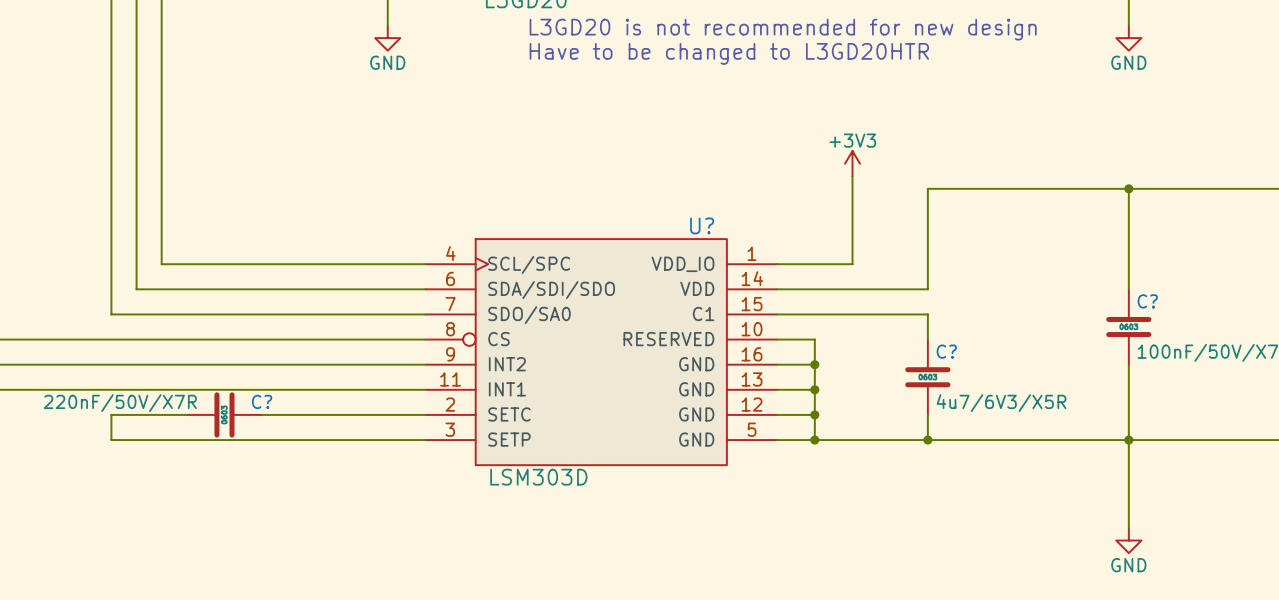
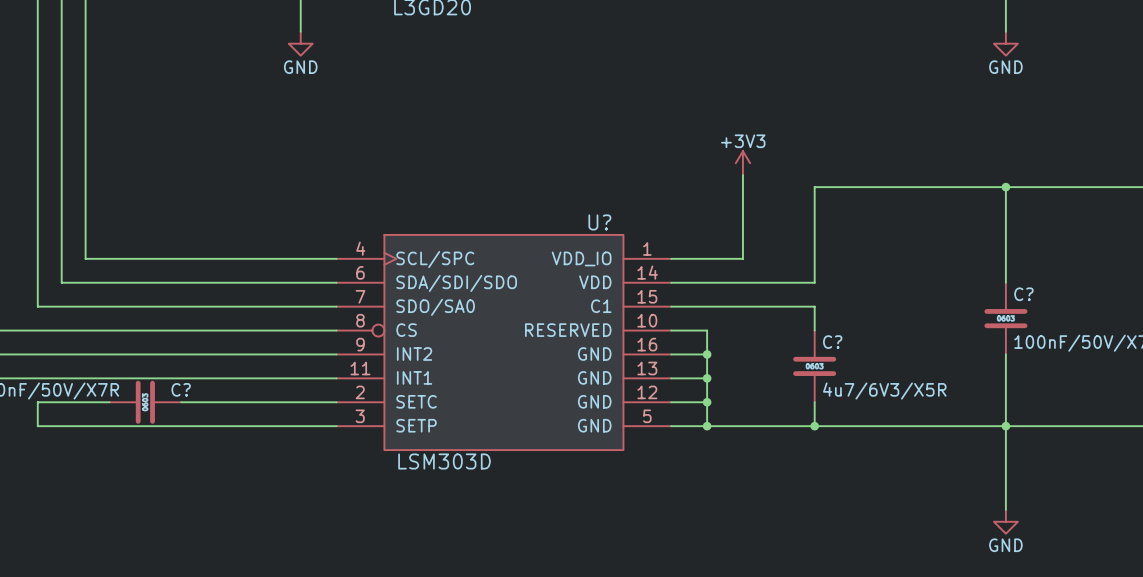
text: L3GD20 is not recommended for new design (783, 29) -> none
text: Have to be changed to L3GD20HTR (729, 53) -> none

